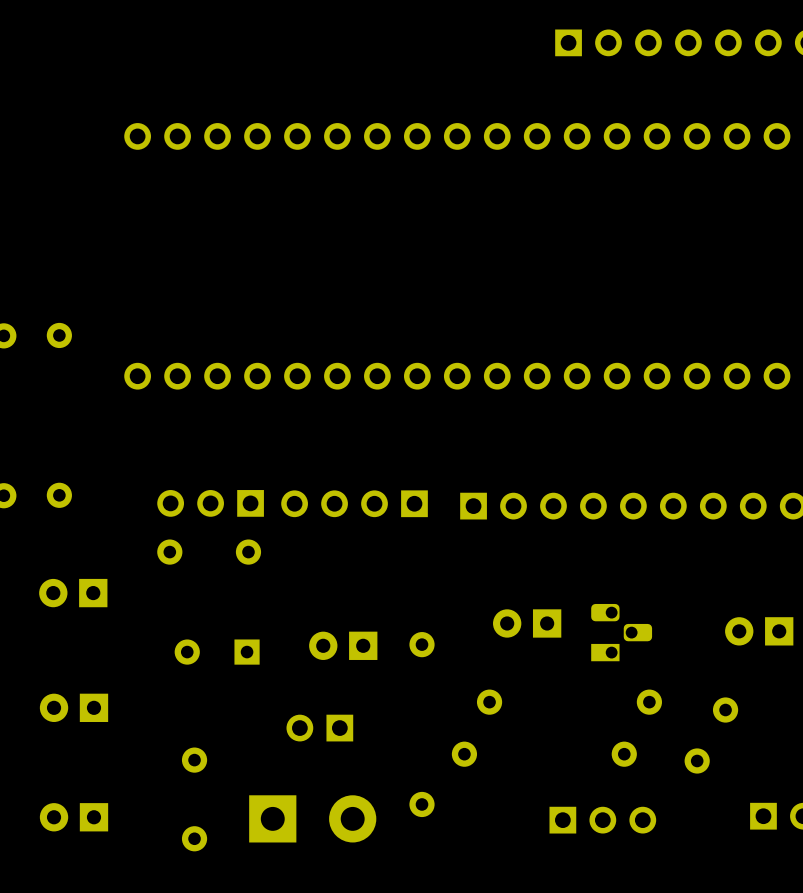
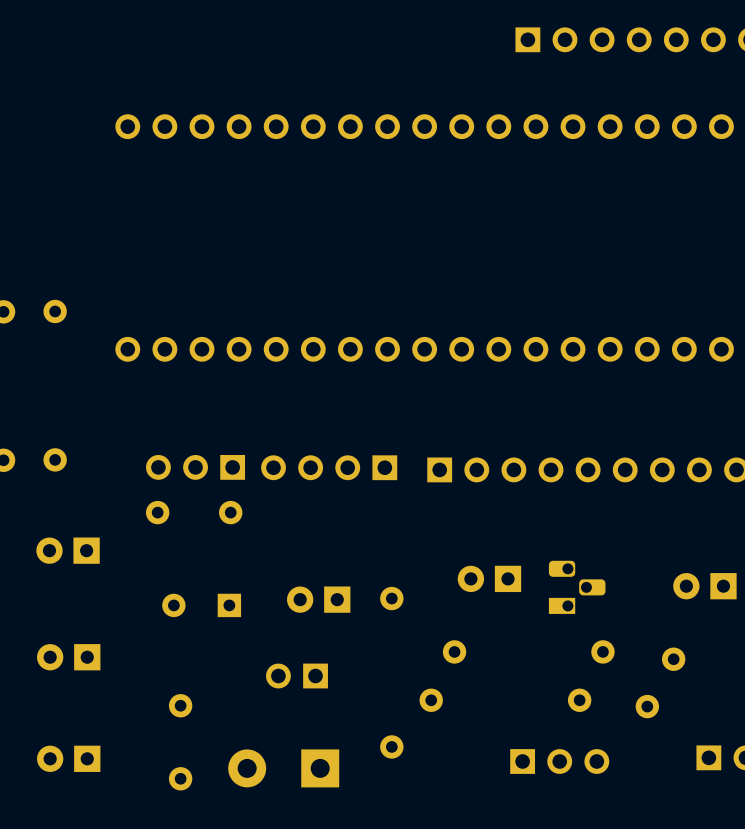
part footprint: [249, 795, 377, 843] -> [228, 749, 340, 788]

